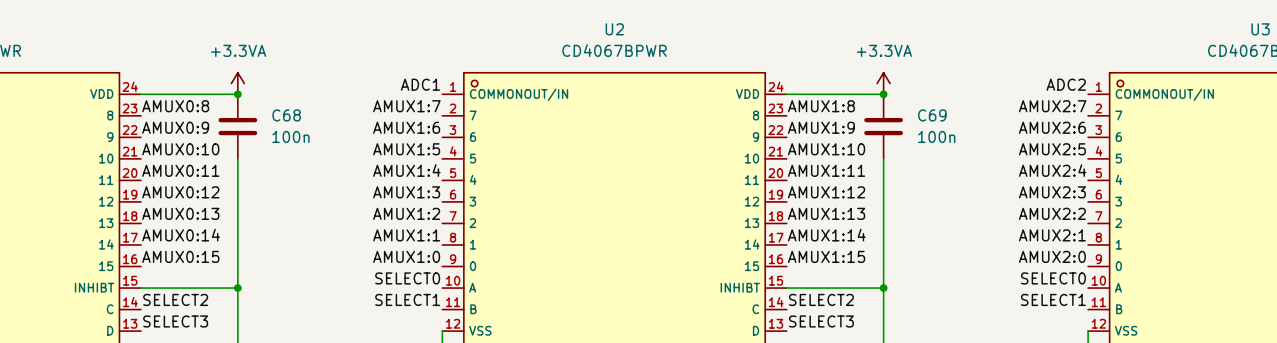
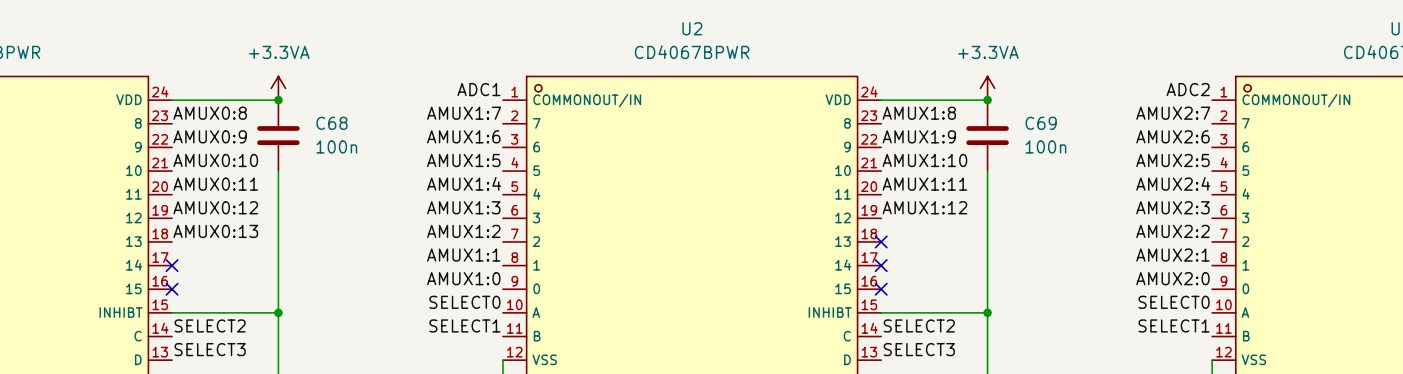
label: AMUX1:13 (826, 213) -> none
no-connect mark: none -> (881, 241)
label: AMUX0:14 (181, 235) -> none
label: AMUX1:14 (826, 235) -> none
no-connect mark: none -> (172, 265)
no-connect mark: none -> (881, 265)
label: AMUX0:15 (180, 256) -> none
label: AMUX1:15 (826, 256) -> none
no-connect mark: none -> (172, 289)
no-connect mark: none -> (881, 289)

